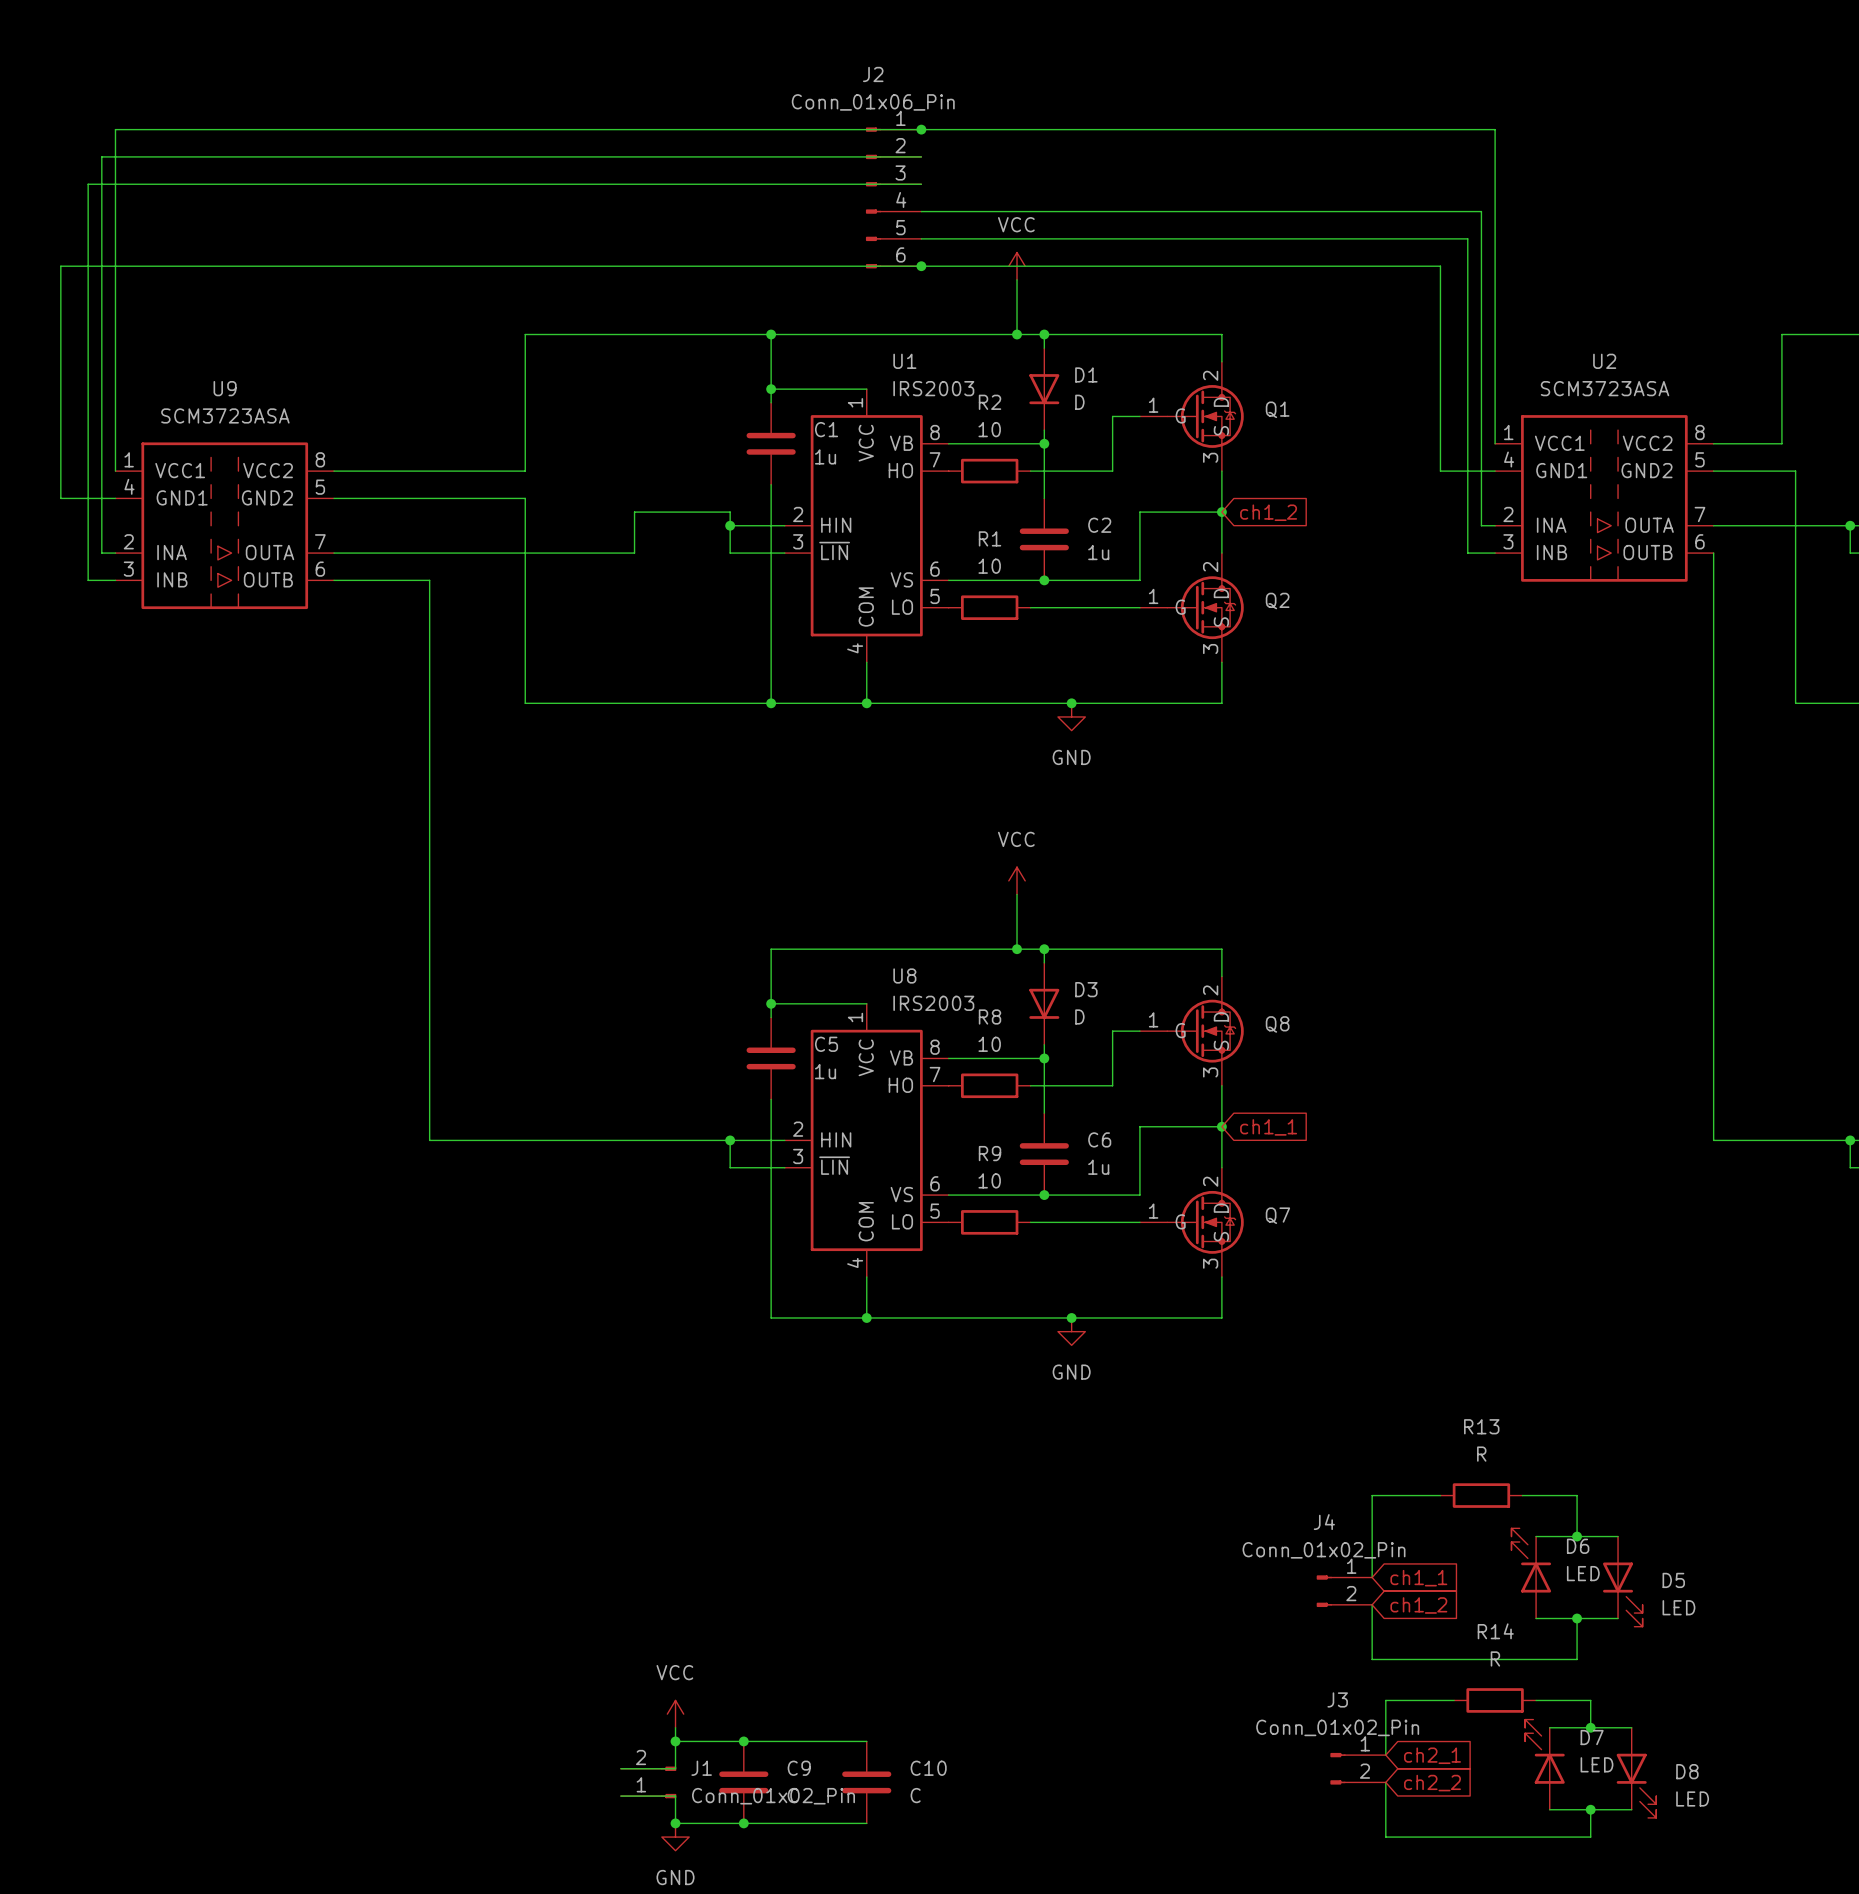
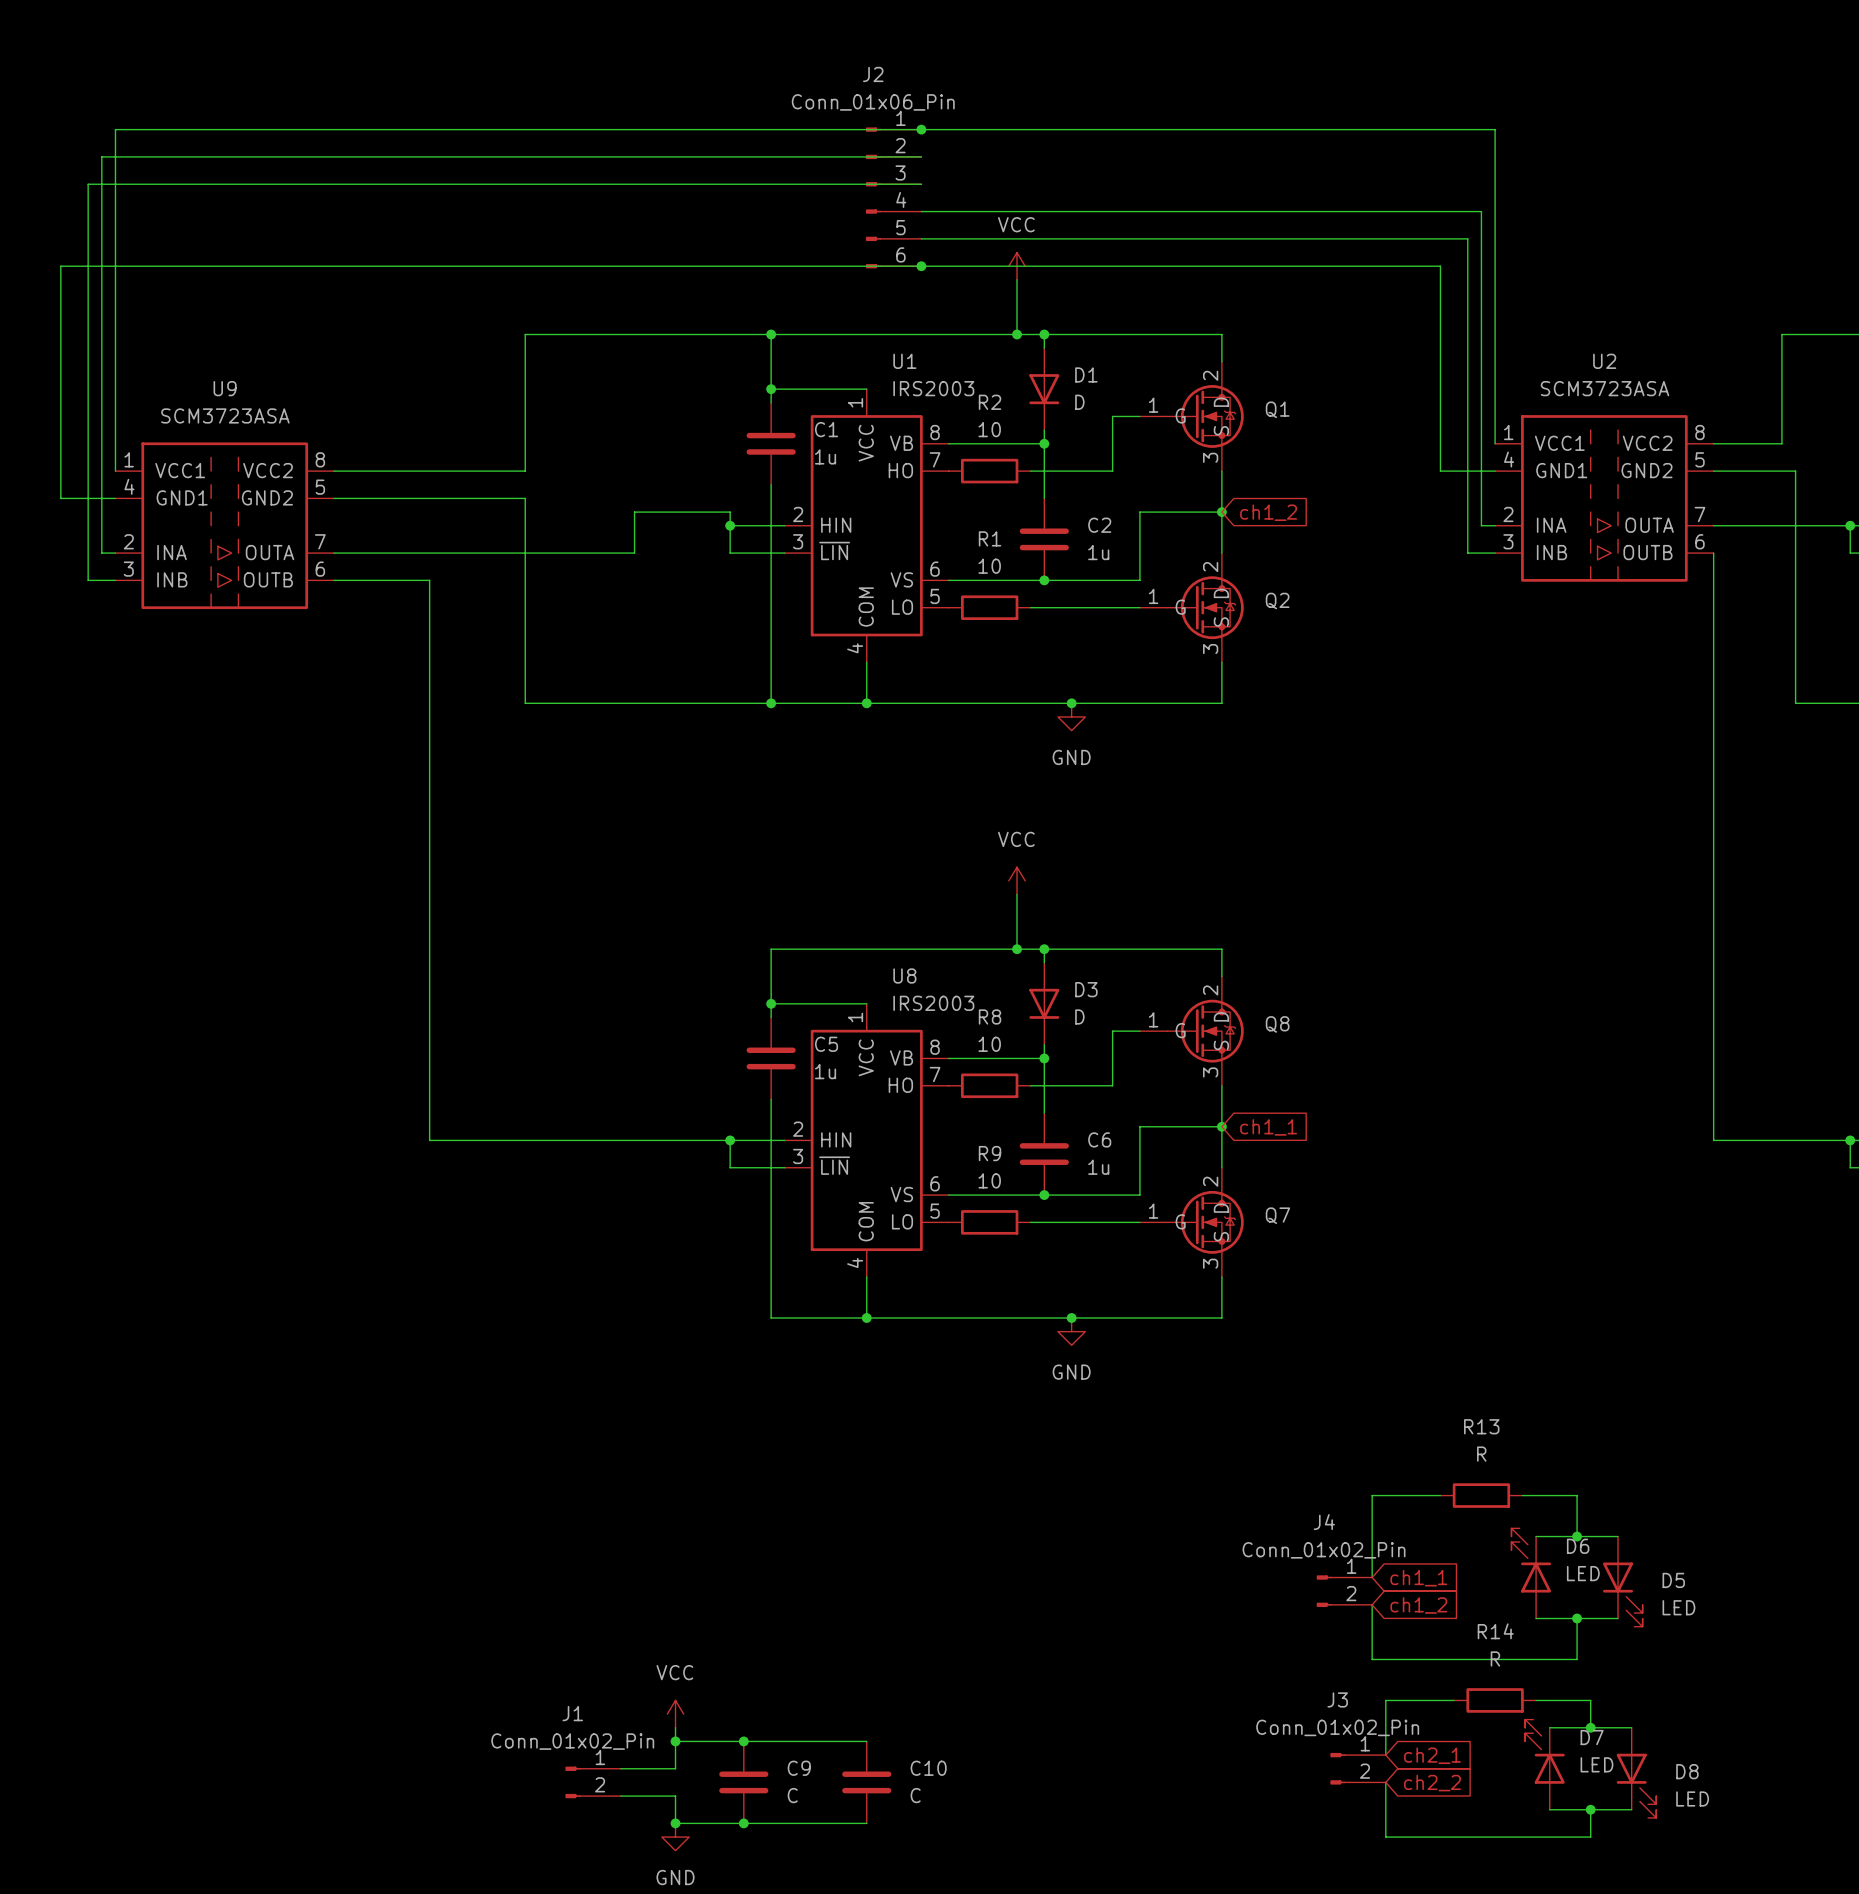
J1 name position: J1 (701, 1768) -> J1 (572, 1713)
J1 position: (648, 1782) -> (593, 1782)
J1 rotation: 0° (668, 1782) -> 180° (573, 1782)
J1 value position: Conn_01x02_Pin (773, 1796) -> Conn_01x02_Pin (572, 1741)

